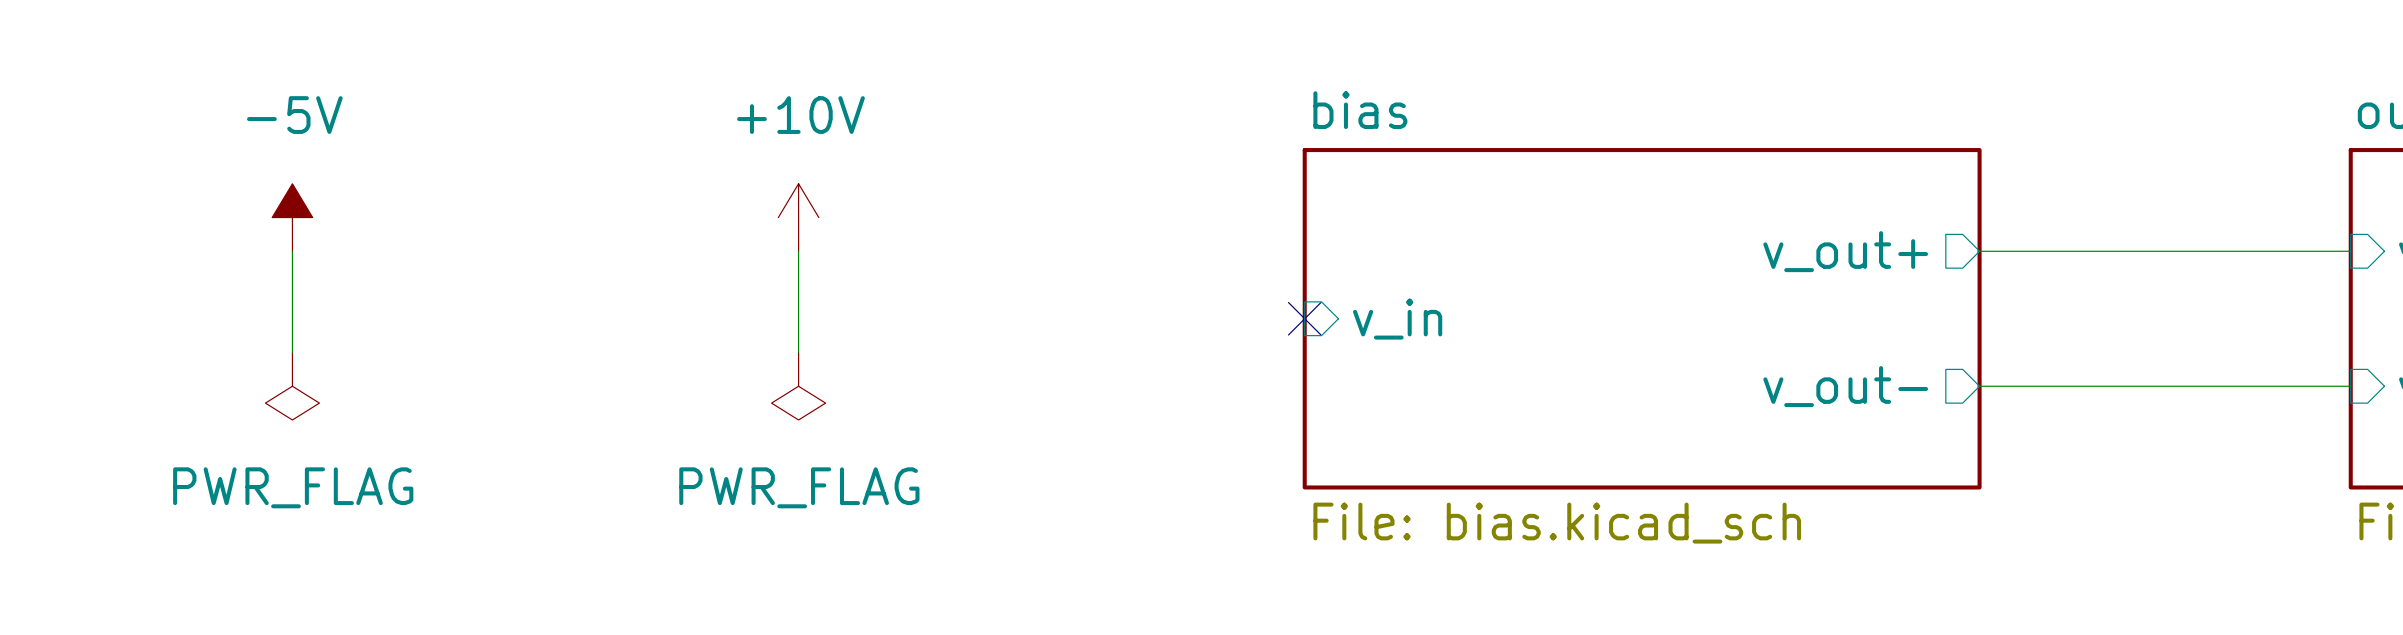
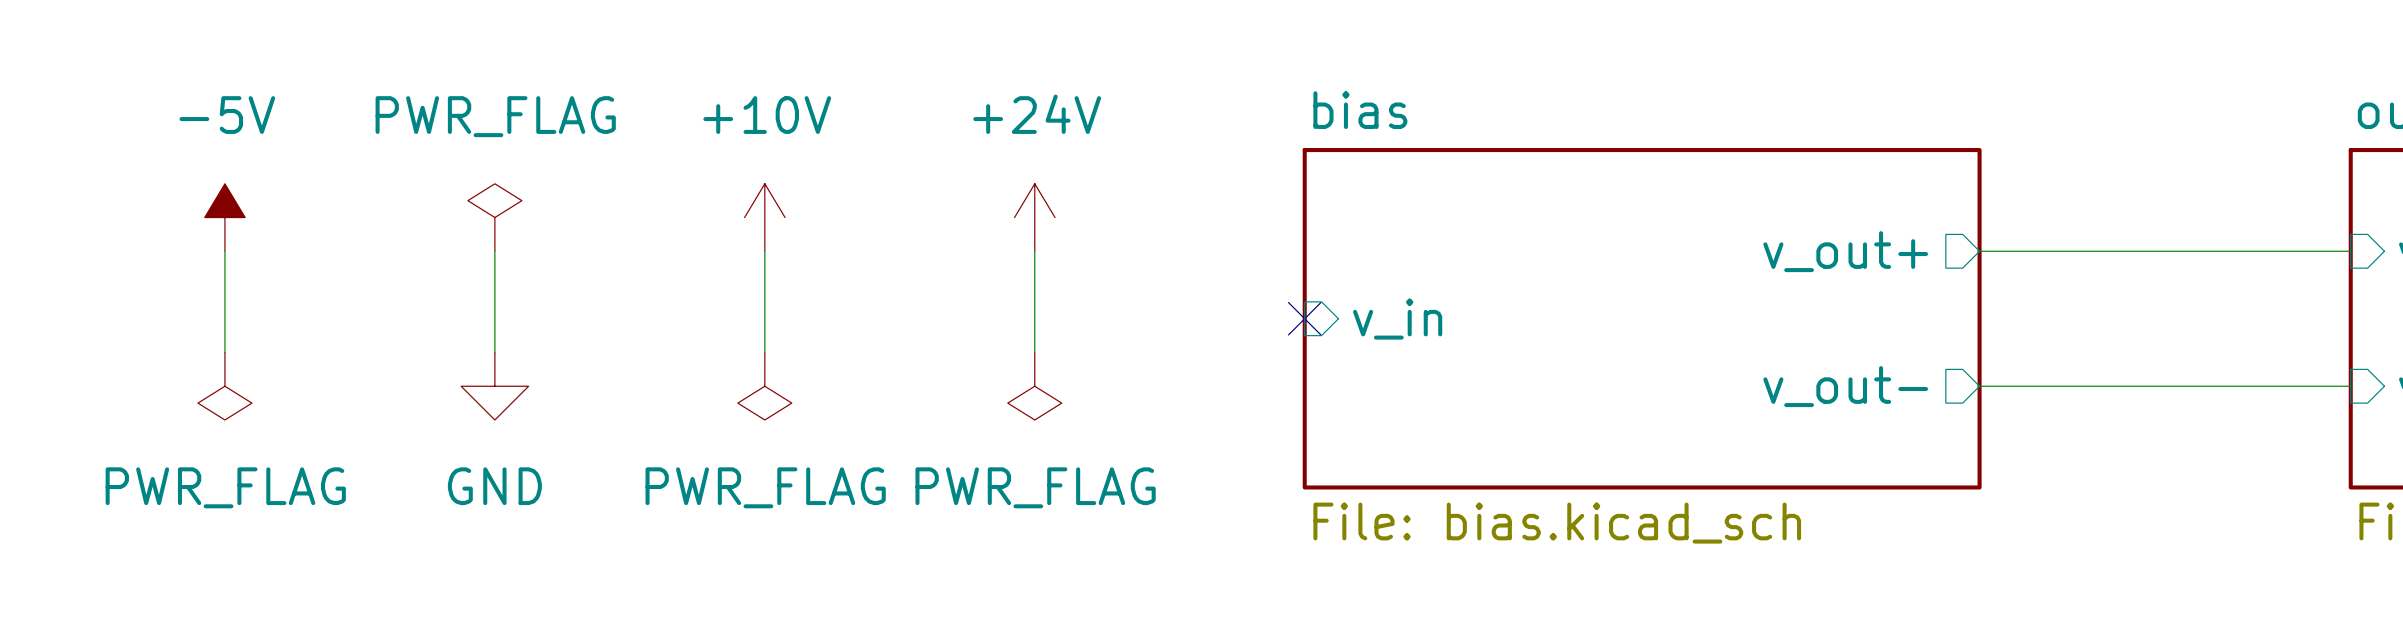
power symbol position: -5V (292, 217) -> -5V (224, 217)
power symbol: none -> PWR_FLAG (494, 217)
power symbol position: +10V (798, 217) -> +10V (764, 217)
power symbol: none -> +24V (1034, 217)
wire: (292, 251) (292, 352) -> (224, 251) (224, 352)
wire: none -> (494, 251) (494, 352)
wire: (798, 251) (798, 352) -> (764, 251) (764, 352)
wire: none -> (1034, 251) (1034, 352)
power symbol position: PWR_FLAG (292, 386) -> PWR_FLAG (224, 386)
power symbol: none -> GND (494, 386)
power symbol position: PWR_FLAG (798, 386) -> PWR_FLAG (764, 386)
power symbol: none -> PWR_FLAG (1034, 386)

